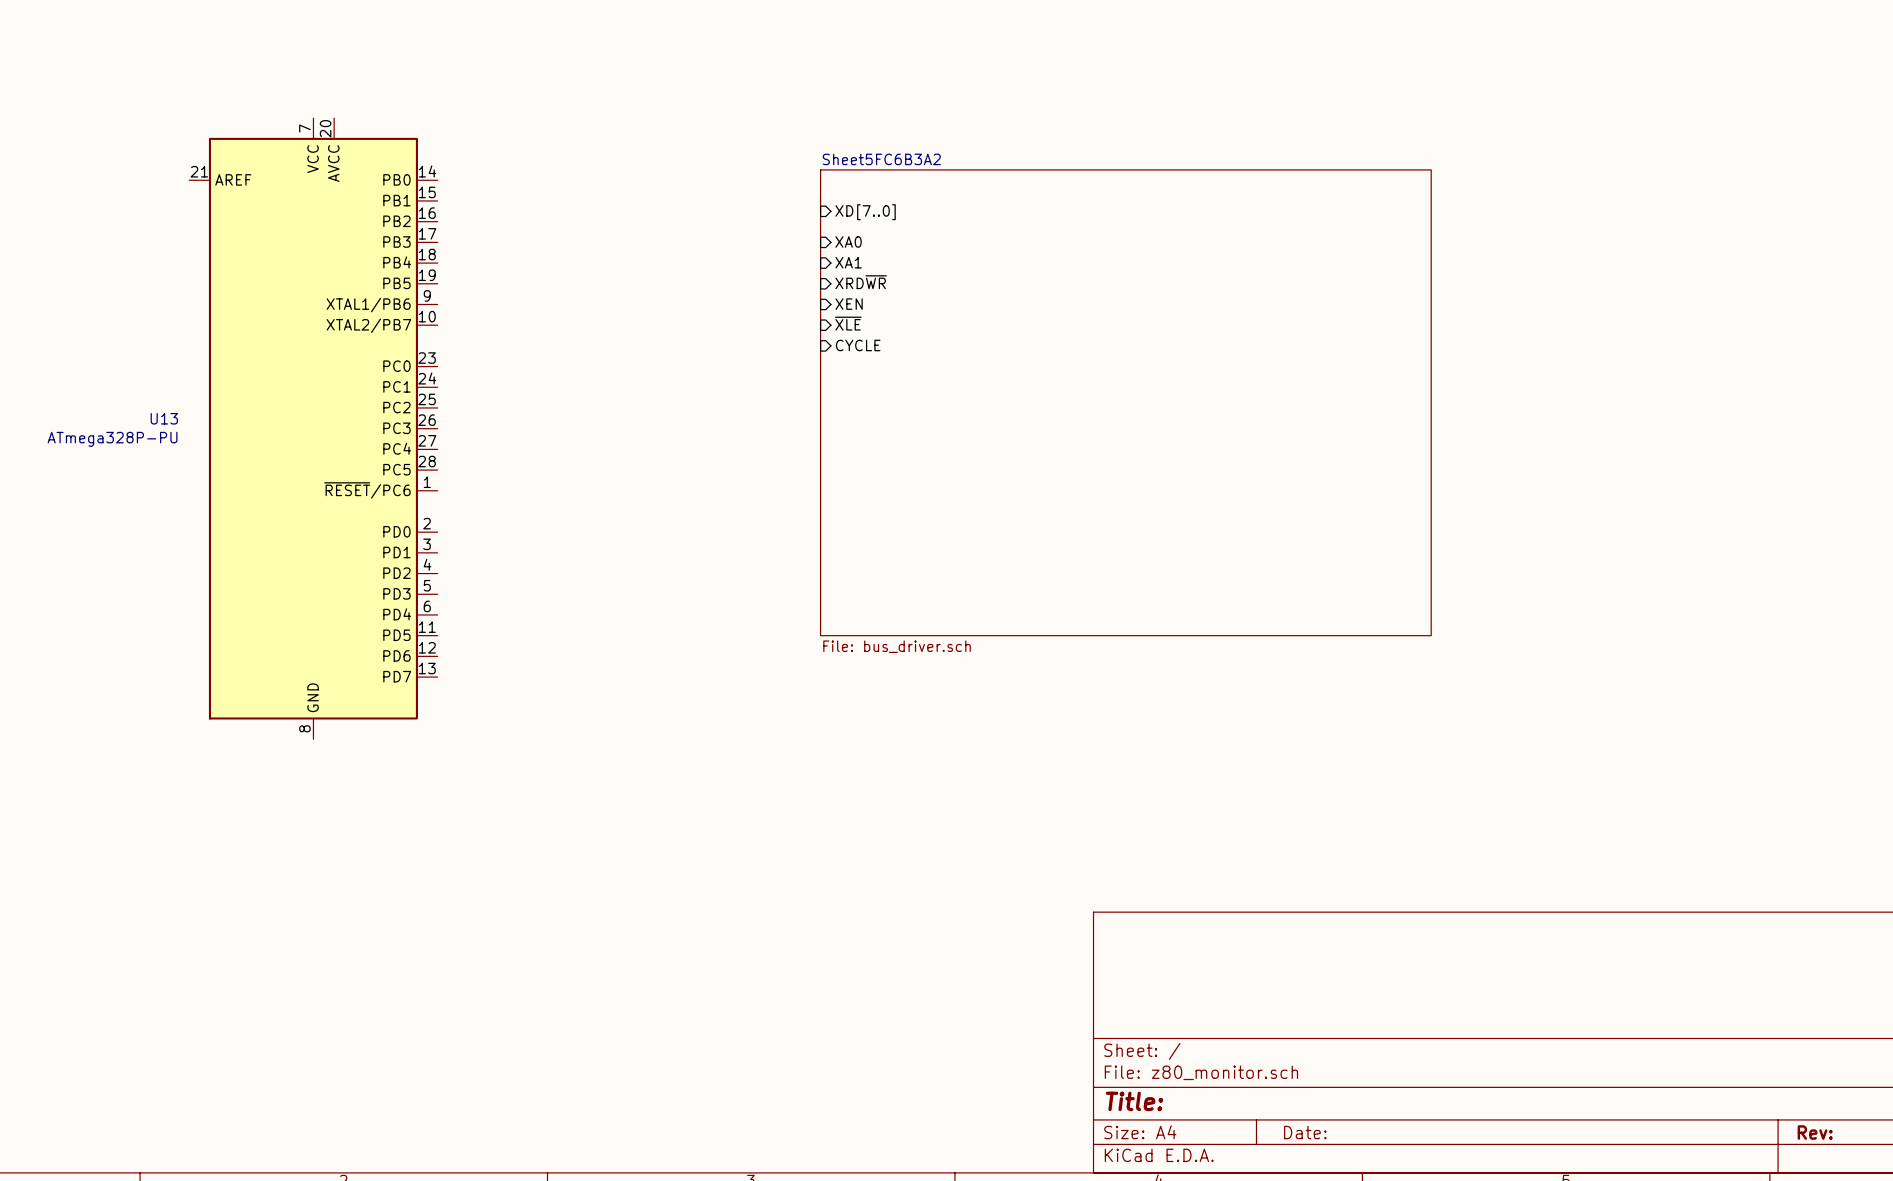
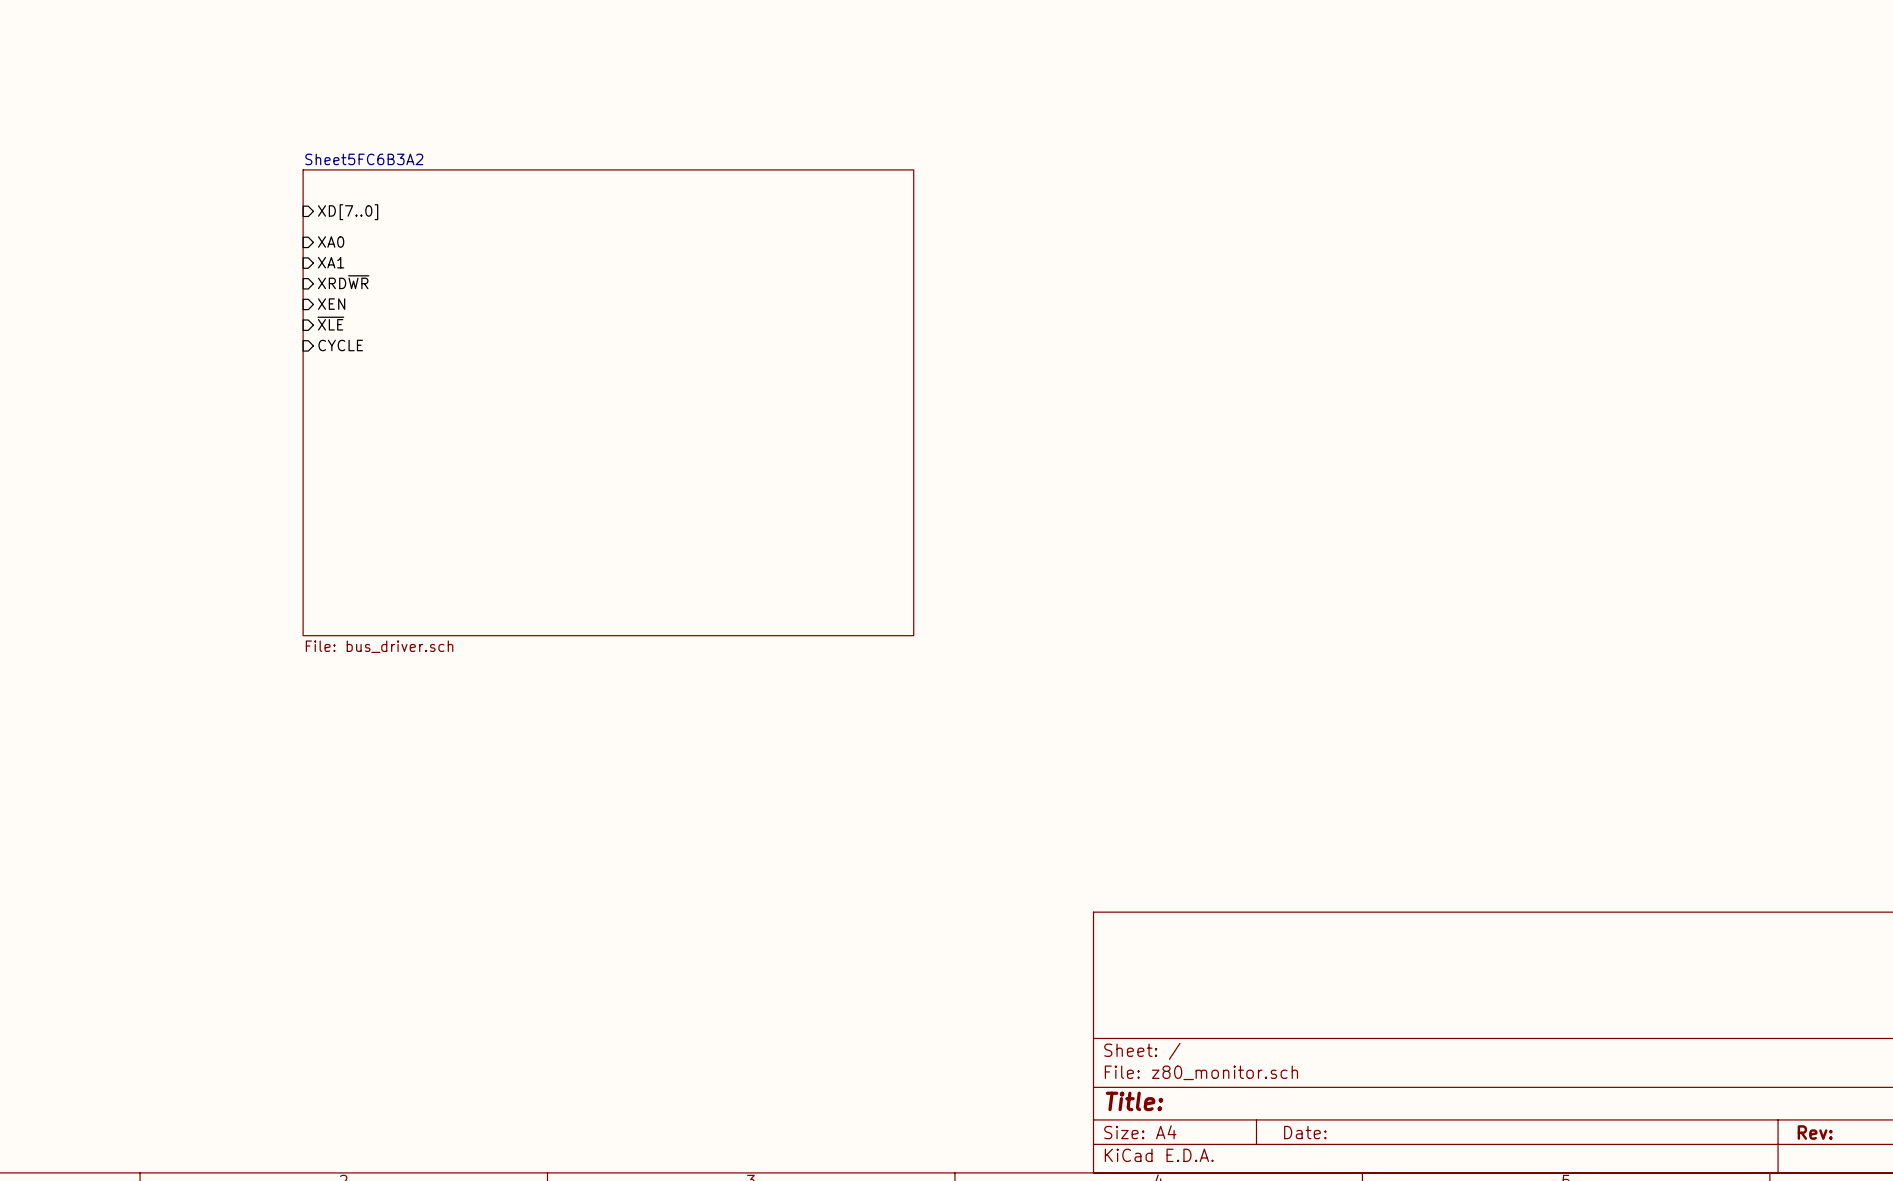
sheet pin: none -> XD[7..0] (348, 212)
sheet pin: XD[7..0] (865, 212) -> none
sheet pin: none -> XA0 (331, 242)
sheet pin: XA0 (848, 242) -> none
sheet pin: none -> XA1 (331, 262)
sheet pin: XA1 (848, 262) -> none
sheet pin: none -> XRD~{WR} (343, 282)
sheet pin: XRD~{WR} (861, 282) -> none
sheet pin: none -> XEN (331, 304)
sheet pin: XEN (849, 304) -> none
sheet pin: none -> ~{XLE} (330, 323)
sheet pin: ~{XLE} (848, 323) -> none
sheet pin: none -> CYCLE (340, 345)
sheet pin: CYCLE (858, 345) -> none
sheet Sheet5FC6B3A2 position: (1125, 402) -> (608, 402)
U13: ATmega328P-PU (313, 428) -> none

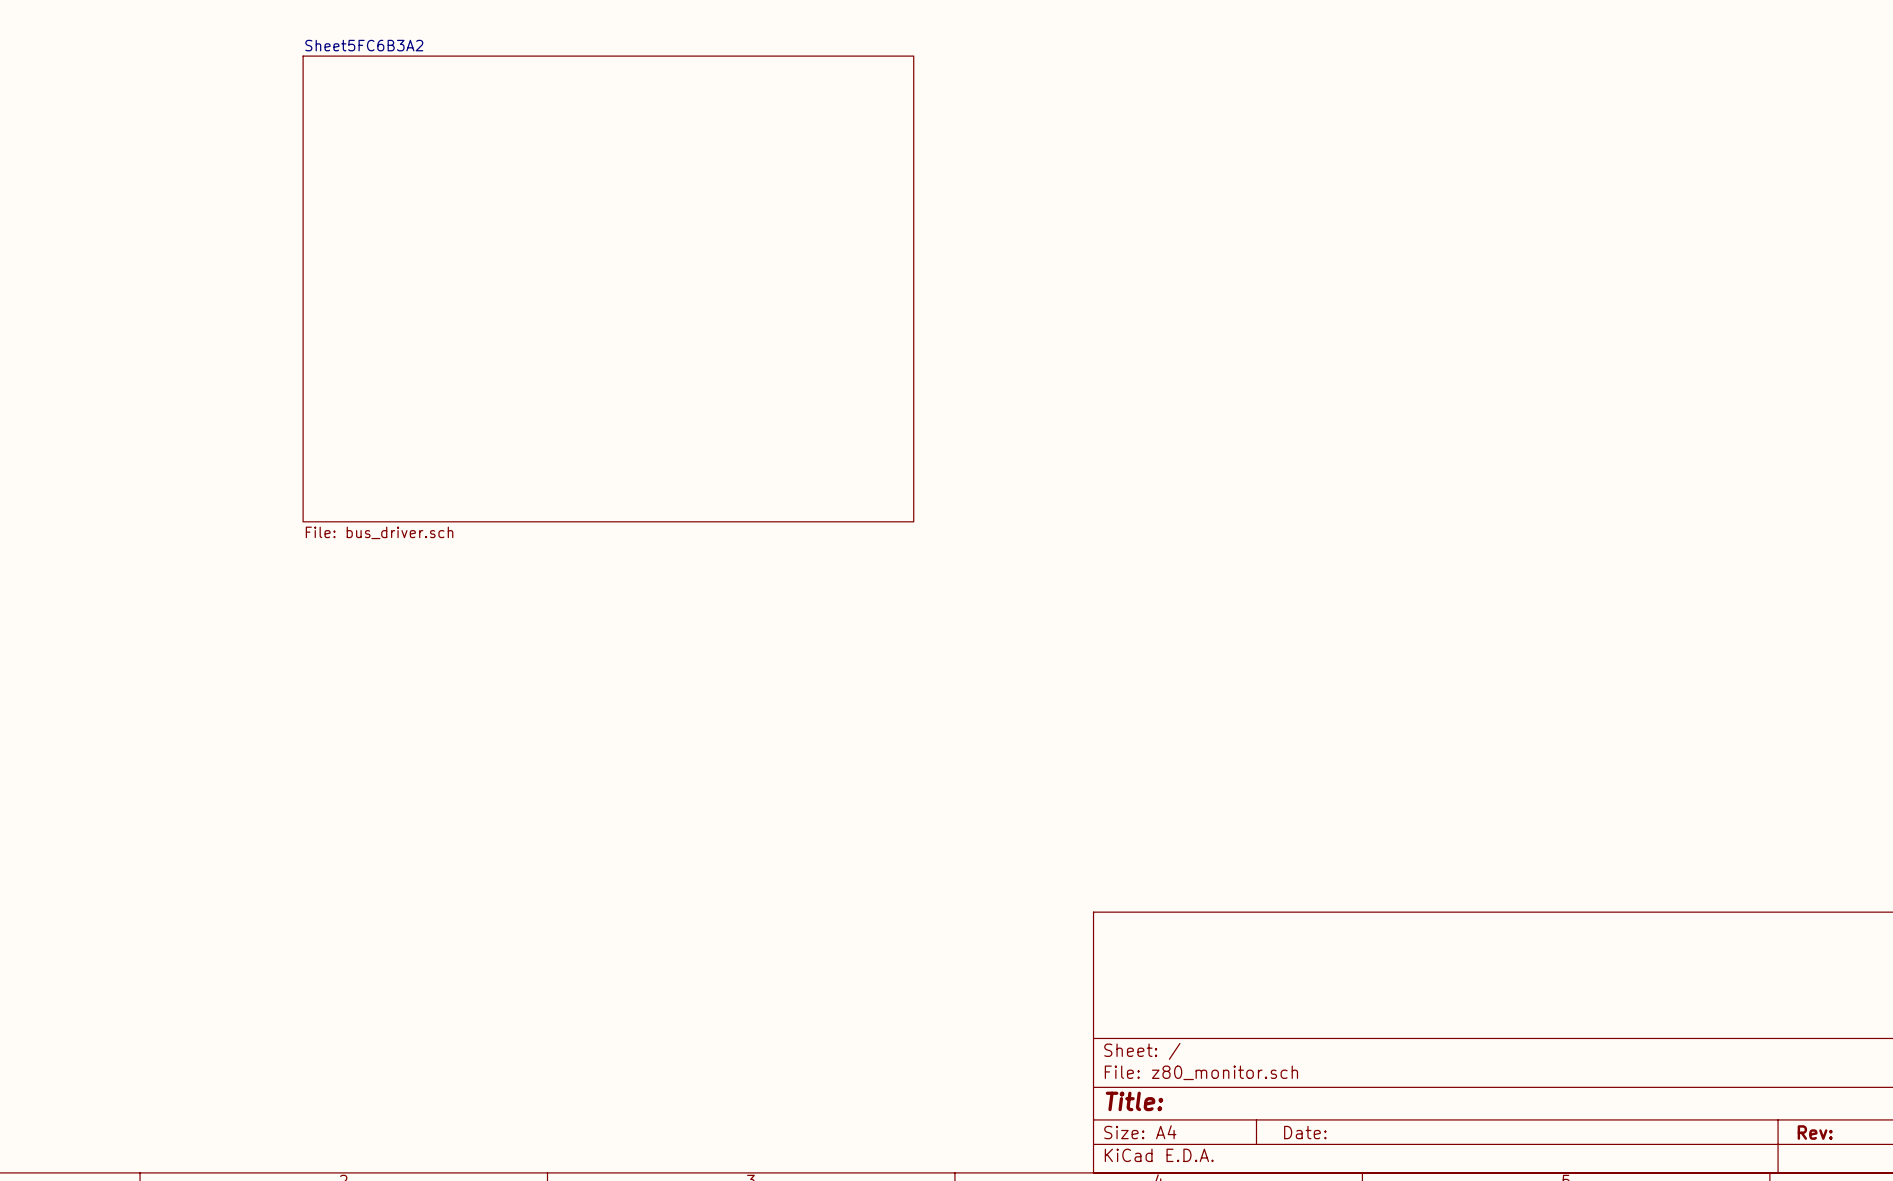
sheet pin: XD[7..0] (348, 212) -> none
sheet pin: XA0 (331, 242) -> none
sheet pin: XA1 (331, 262) -> none
sheet pin: XRD~{WR} (343, 282) -> none
sheet pin: XEN (331, 304) -> none
sheet pin: ~{XLE} (330, 323) -> none
sheet pin: CYCLE (340, 345) -> none
sheet Sheet5FC6B3A2 position: (608, 402) -> (608, 288)

